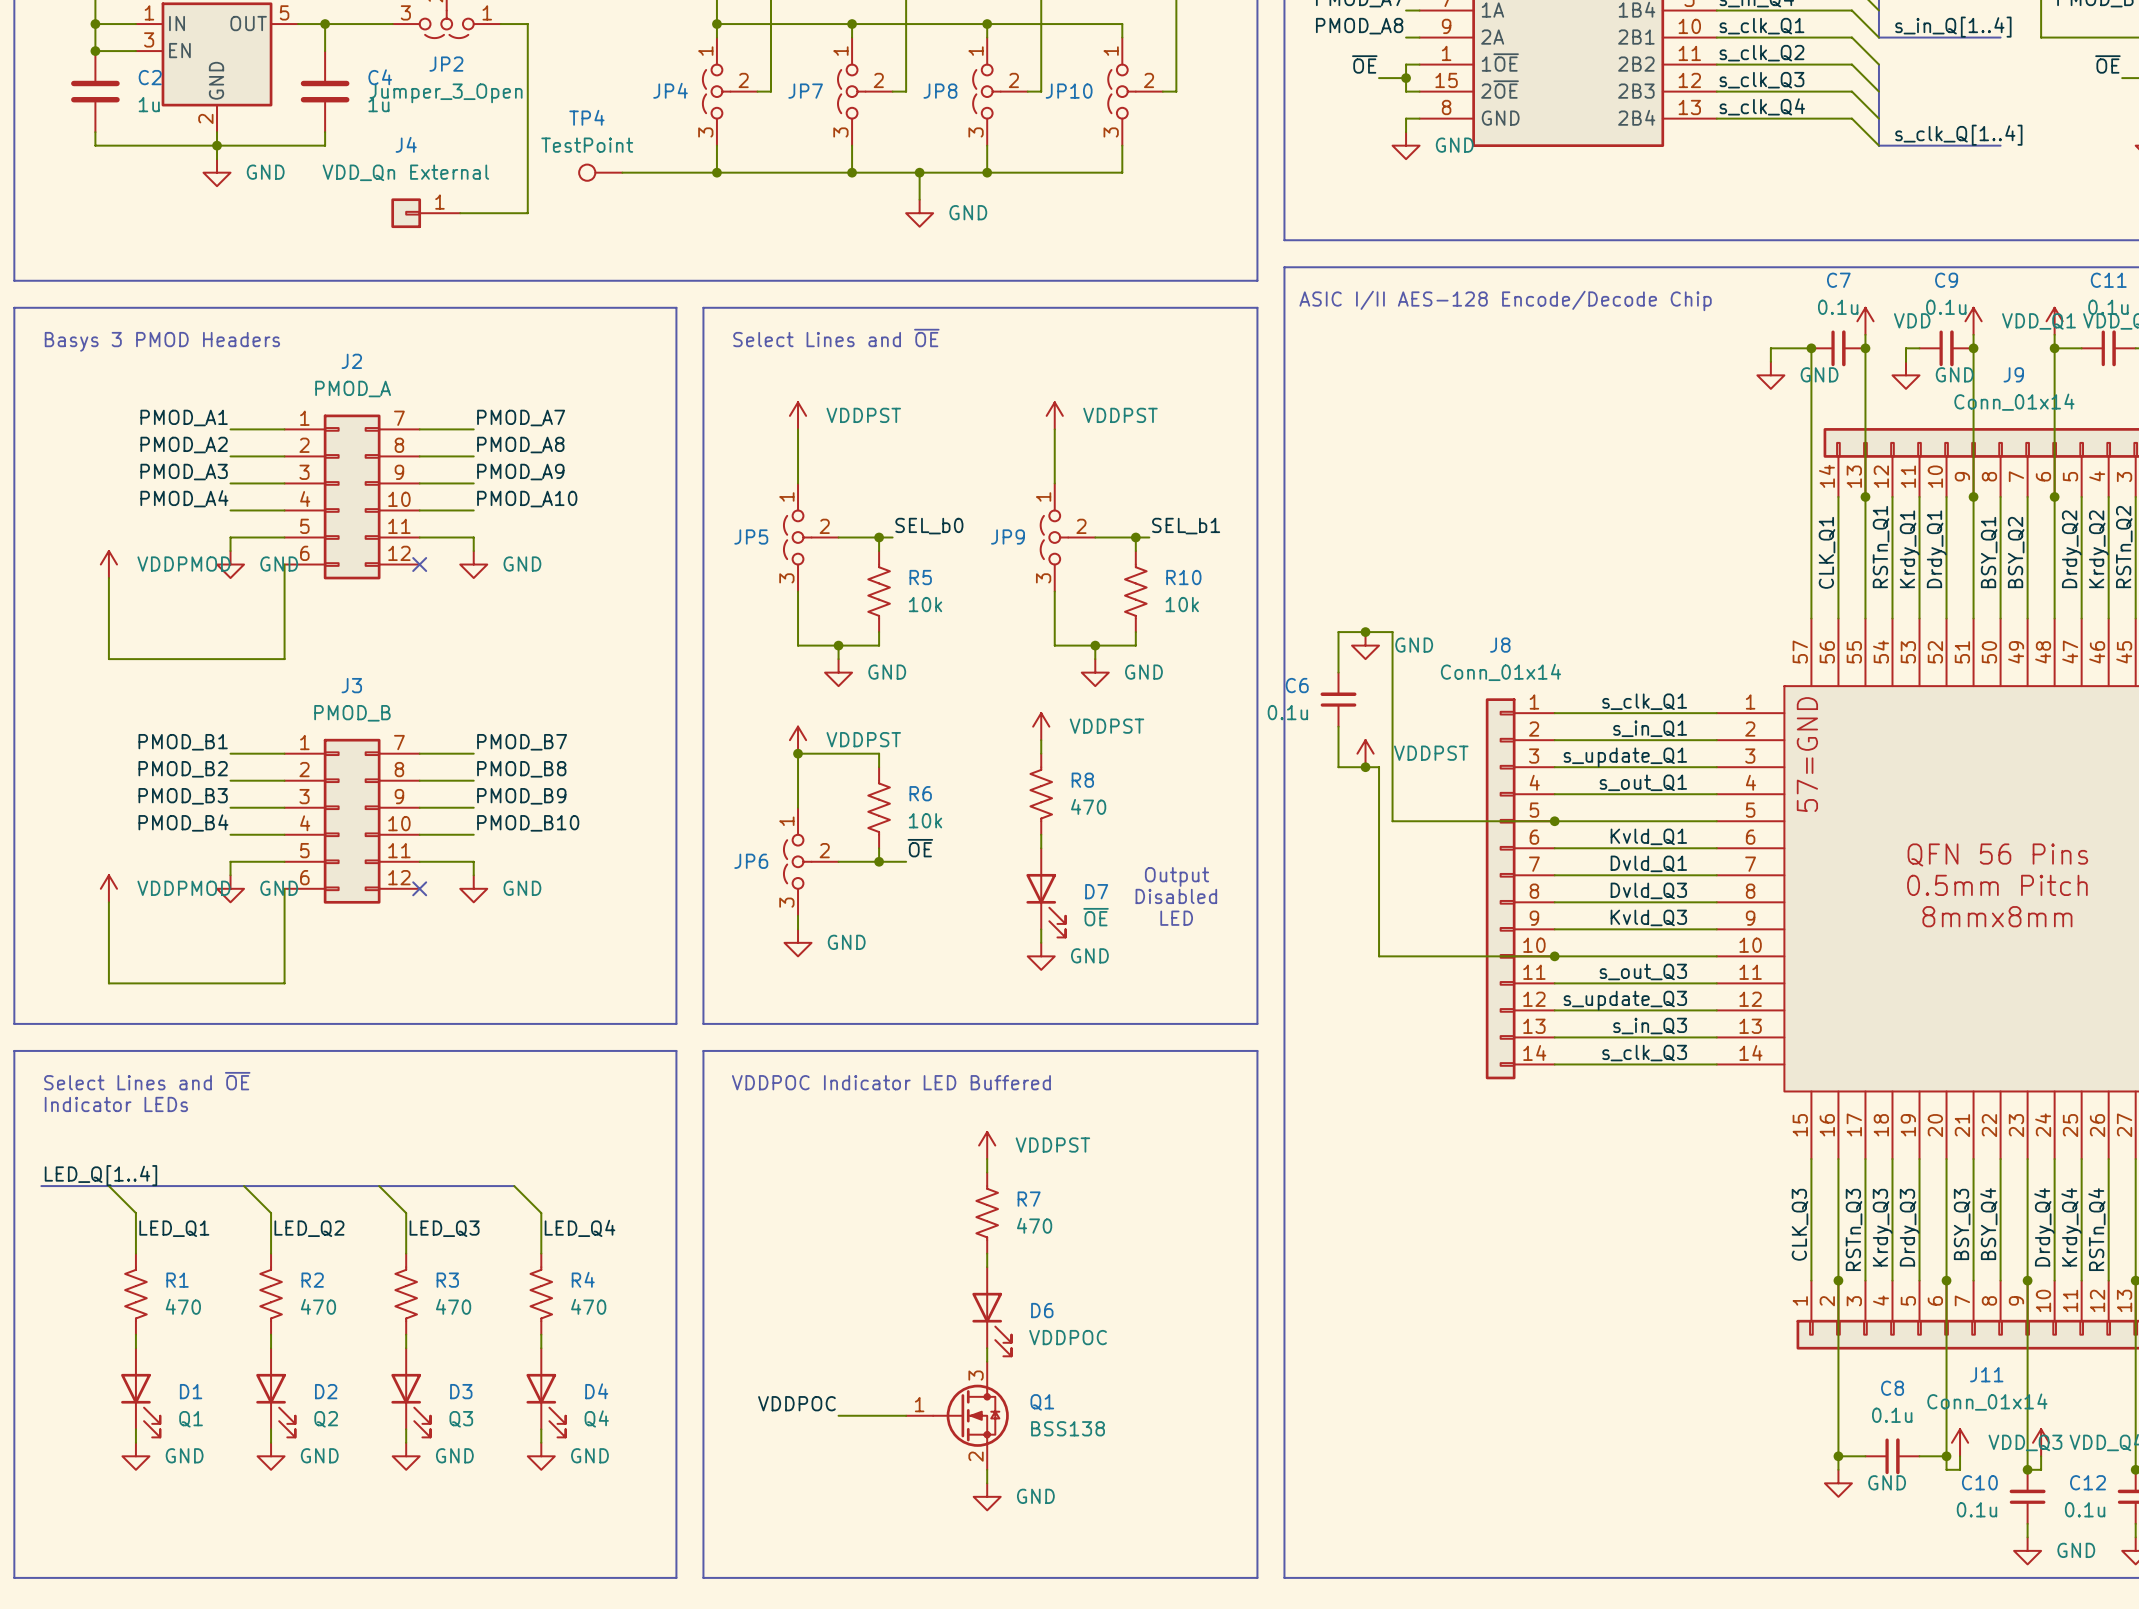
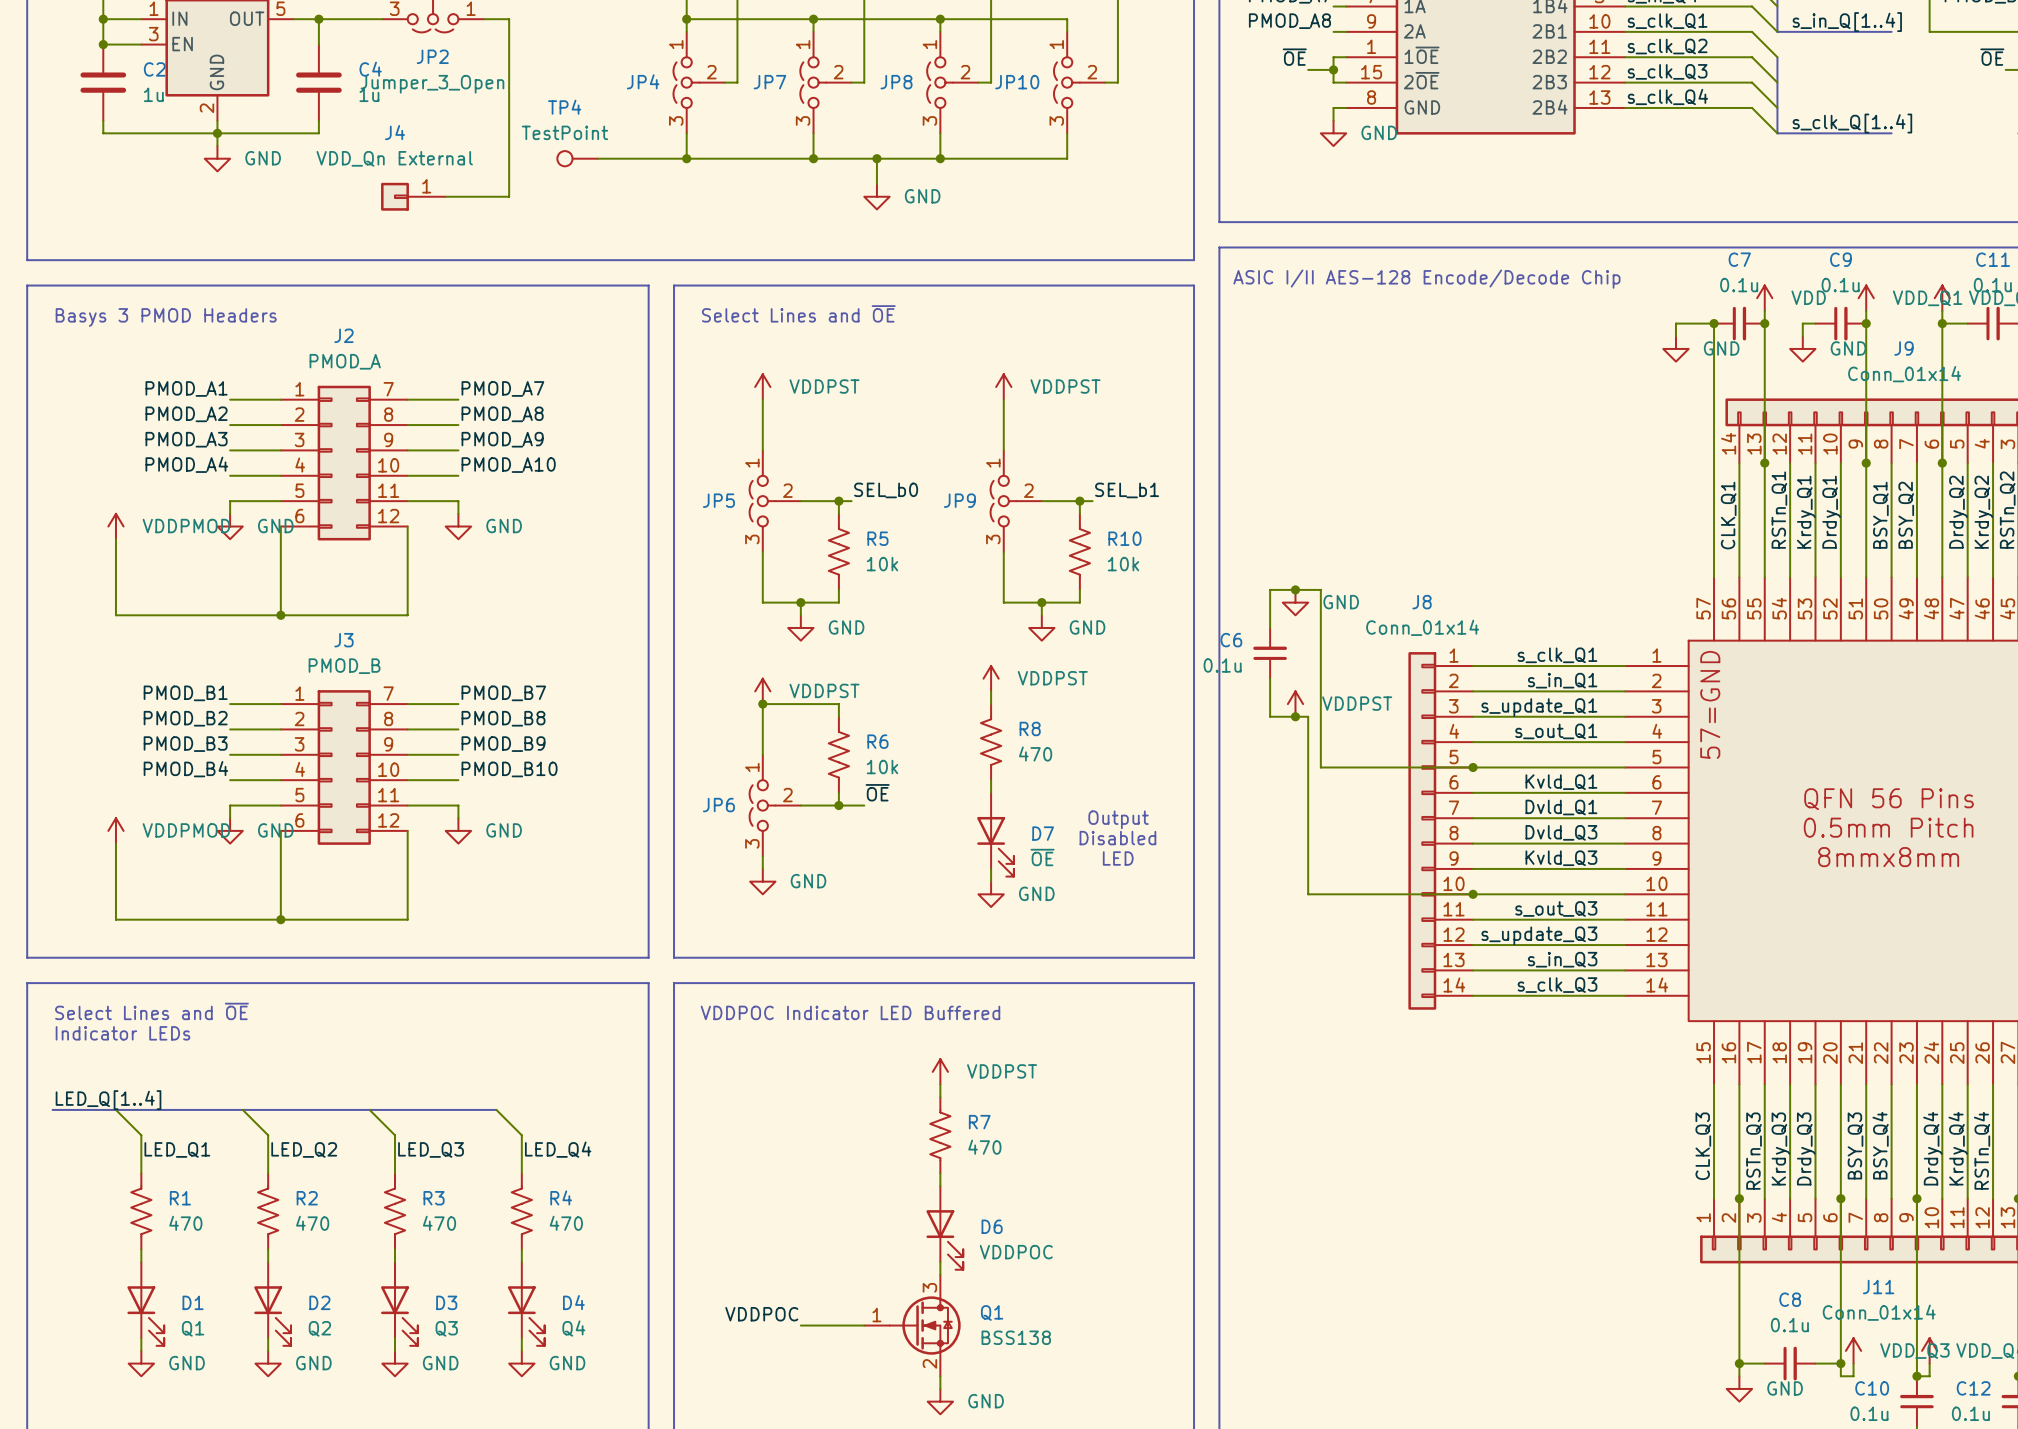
wire: none -> (407, 526) (407, 615) (280, 615)
no-connect mark: (419, 564) -> none
junction: none -> (280, 615)
wire: none -> (407, 830) (407, 919) (280, 919)
no-connect mark: (419, 888) -> none
junction: none -> (280, 919)

